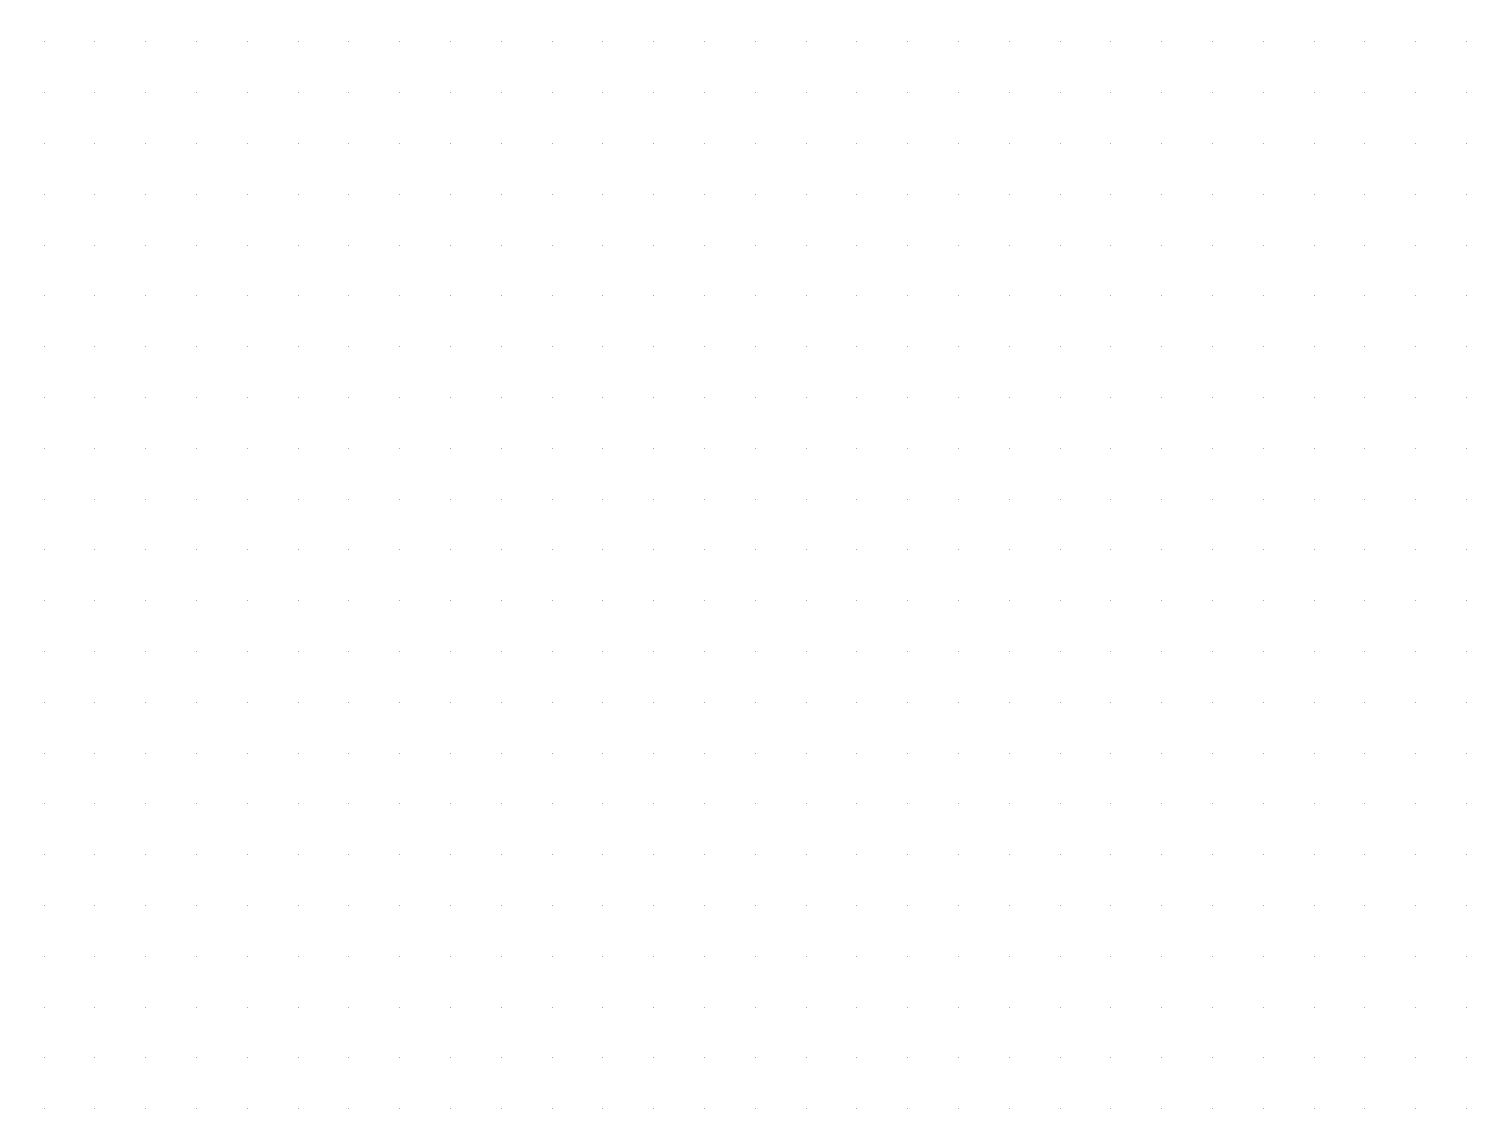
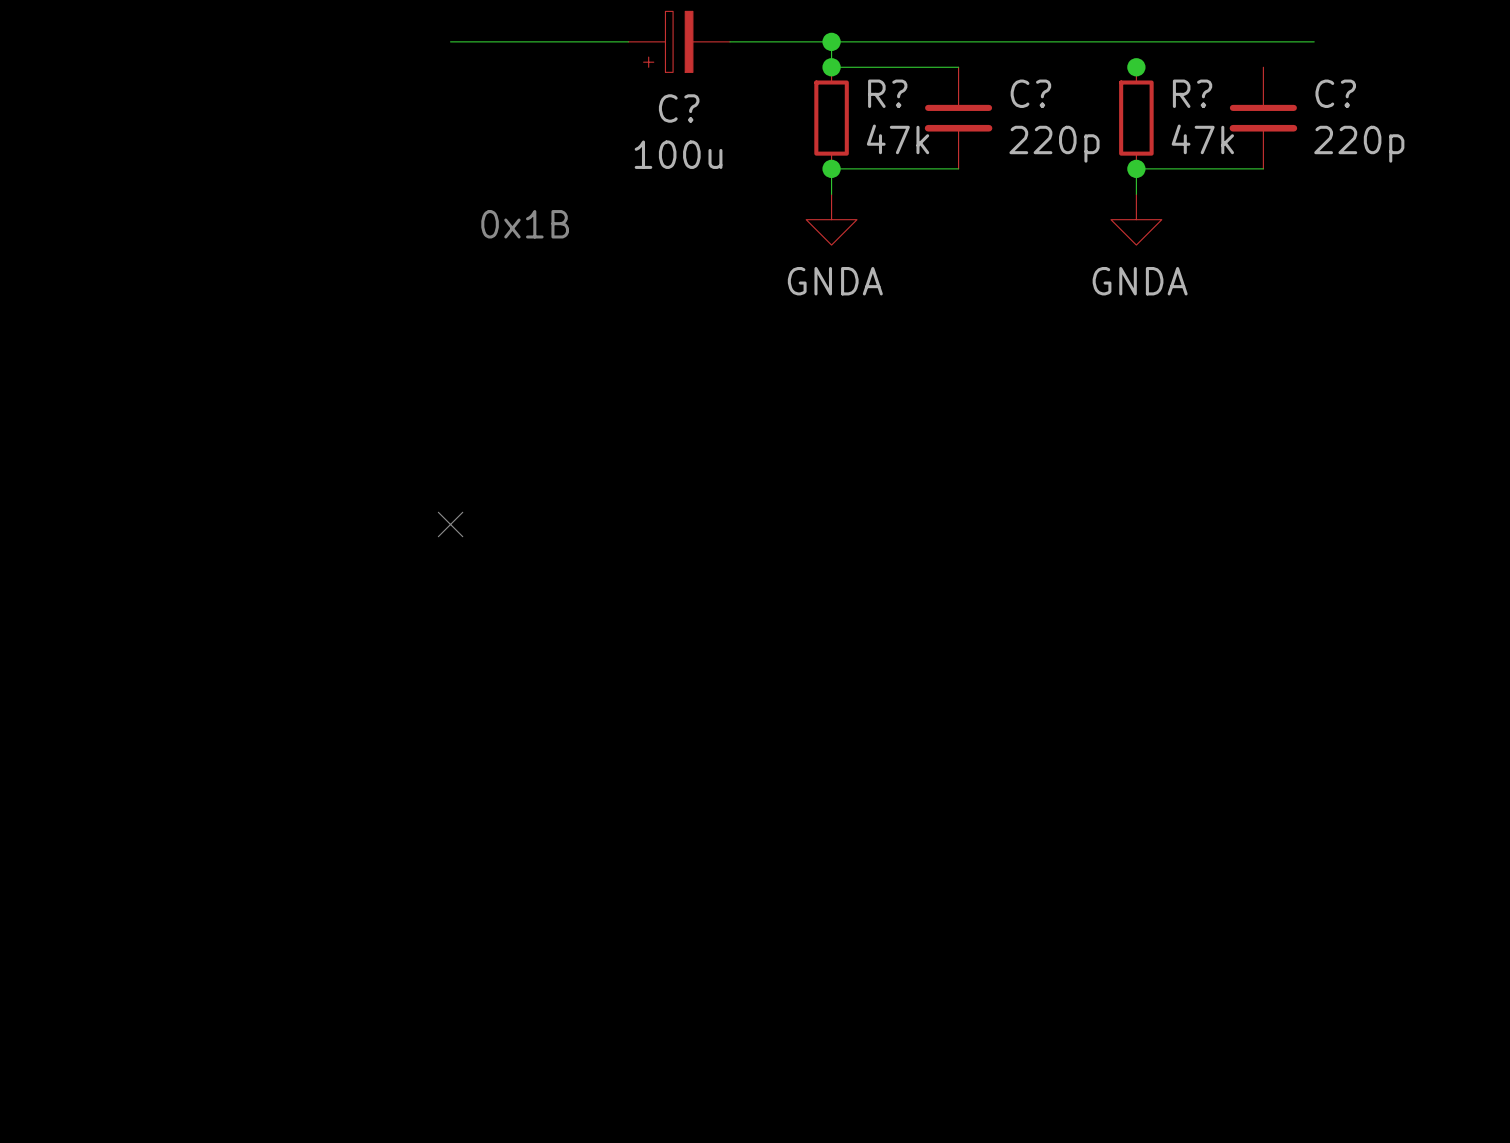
wire: none -> (450, 41) (628, 41)
C?: none -> 100u (679, 41)
wire: none -> (729, 41) (1314, 41)
wire: none -> (831, 41) (831, 67) (958, 67)
junction: none -> (831, 41)
junction: none -> (831, 67)
junction: none -> (1136, 67)
R?: none -> 47k (831, 118)
C?: none -> 220p (958, 118)
R?: none -> 47k (1136, 118)
C?: none -> 220p (1263, 118)
junction: none -> (831, 168)
wire: none -> (958, 168) (831, 168) (831, 194)
junction: none -> (1136, 168)
wire: none -> (1263, 168) (1136, 168) (1136, 194)
power symbol: none -> GNDA (831, 219)
power symbol: none -> GNDA (1136, 219)
text: none -> 0x1B (525, 224)
no-connect mark: none -> (450, 524)

